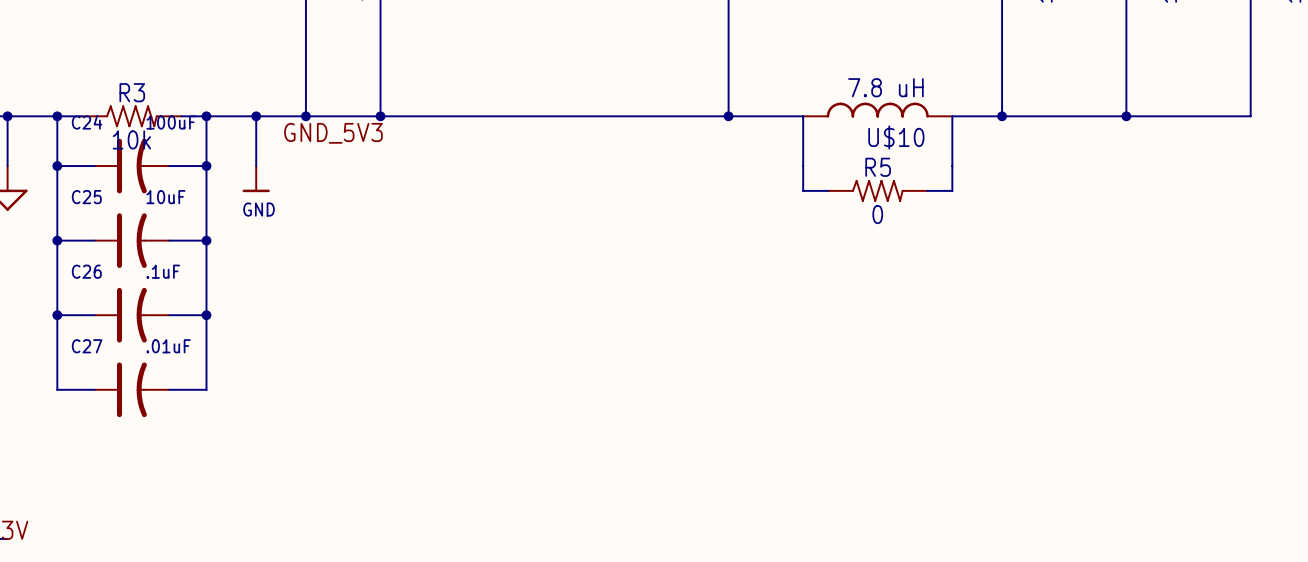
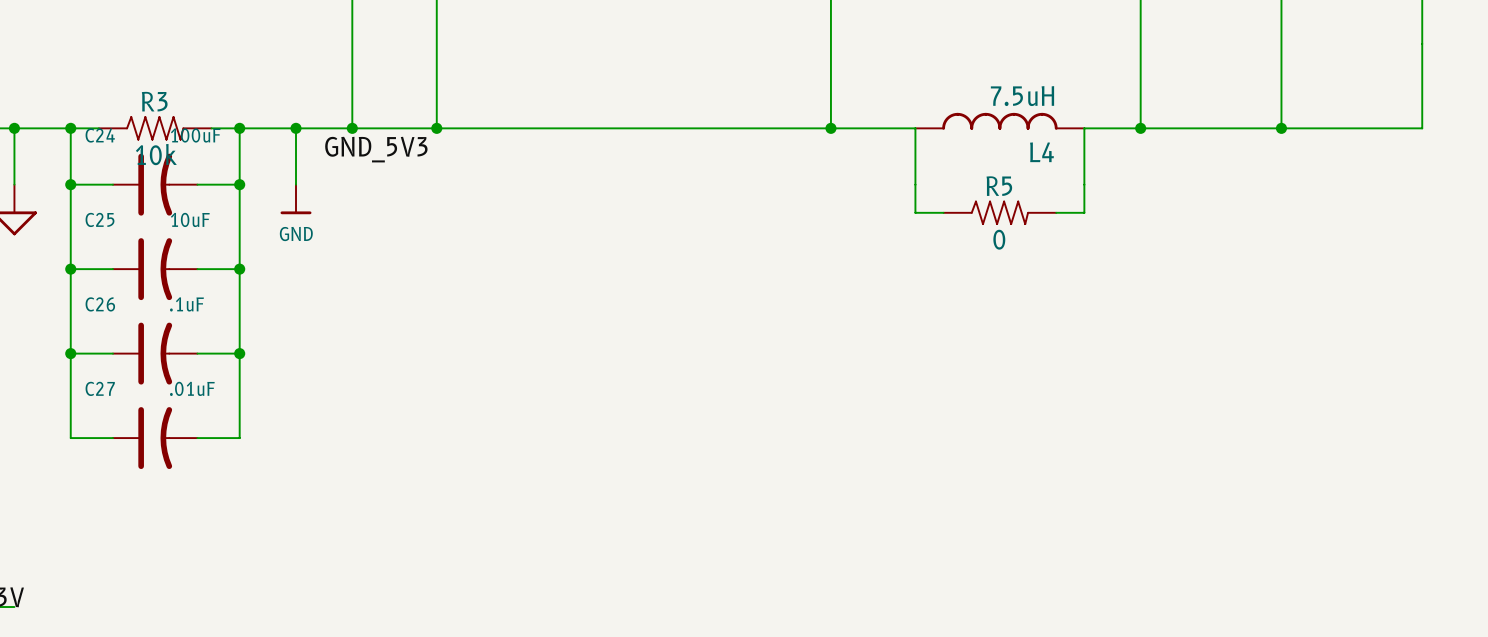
U$10 value: 7.8 uH (885, 87) -> 7.5uH (1022, 96)
U$10 name: U$10 (896, 137) -> L4 (1041, 152)

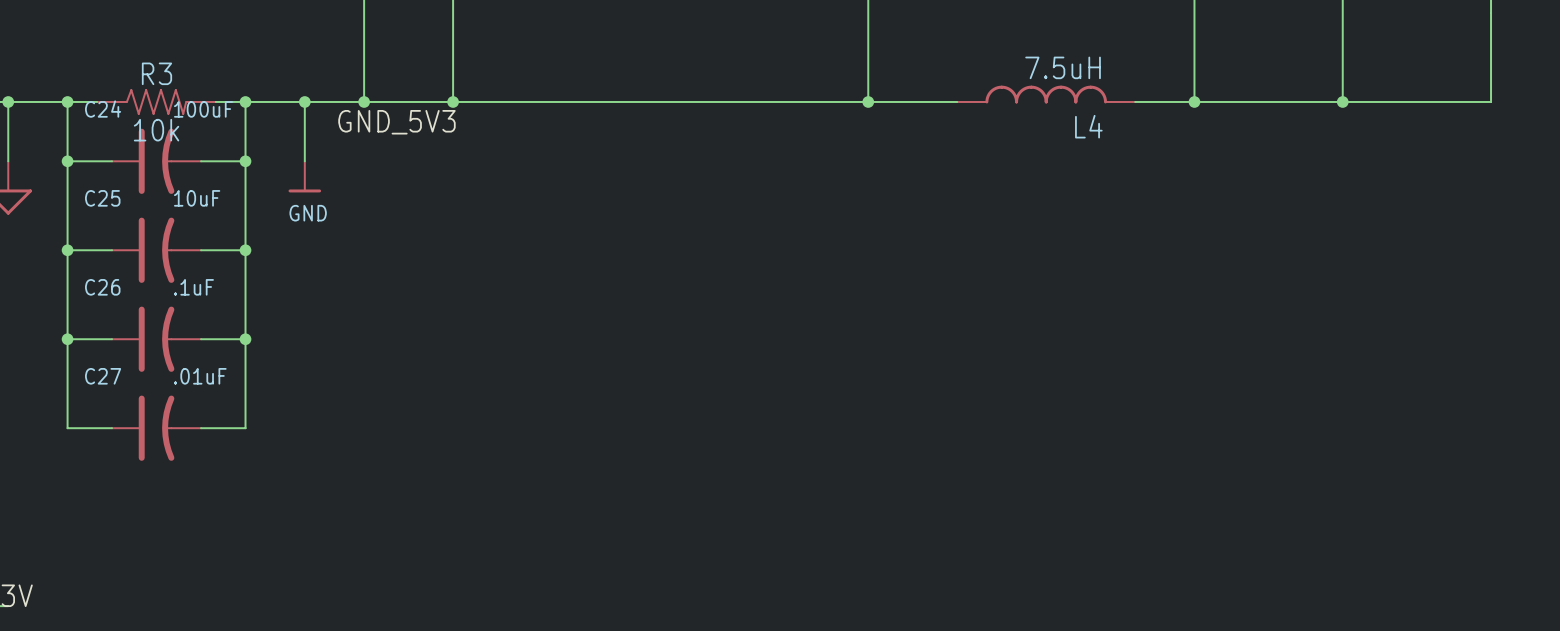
wire: (915, 128) (915, 212) (943, 212) -> none
wire: (1084, 128) (1084, 212) (1056, 212) -> none
R5: 0 (999, 212) -> none

